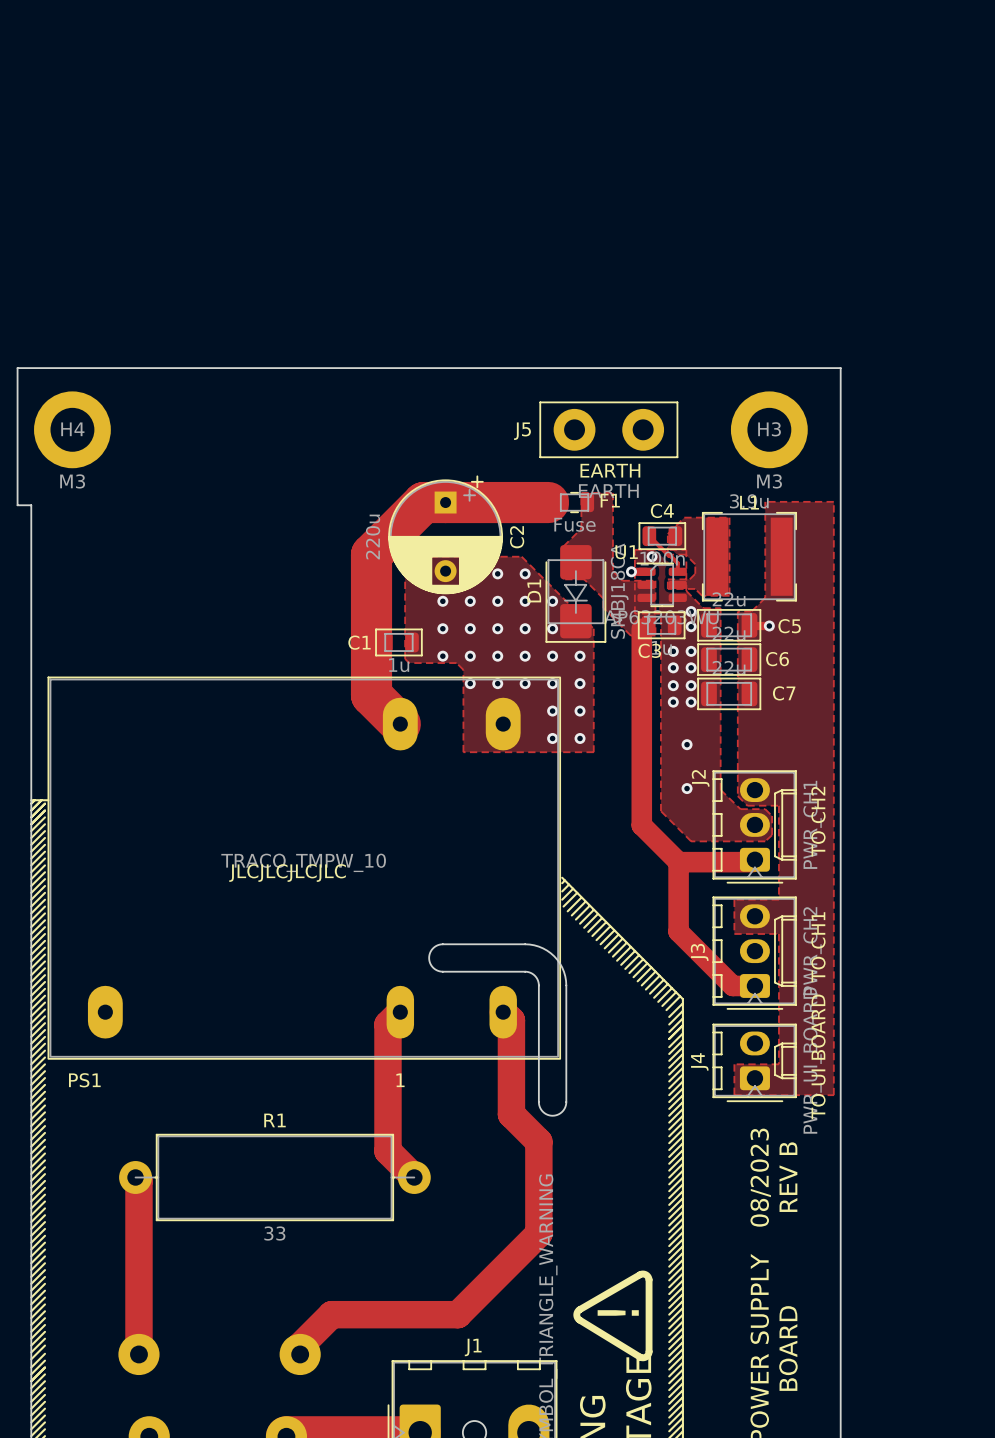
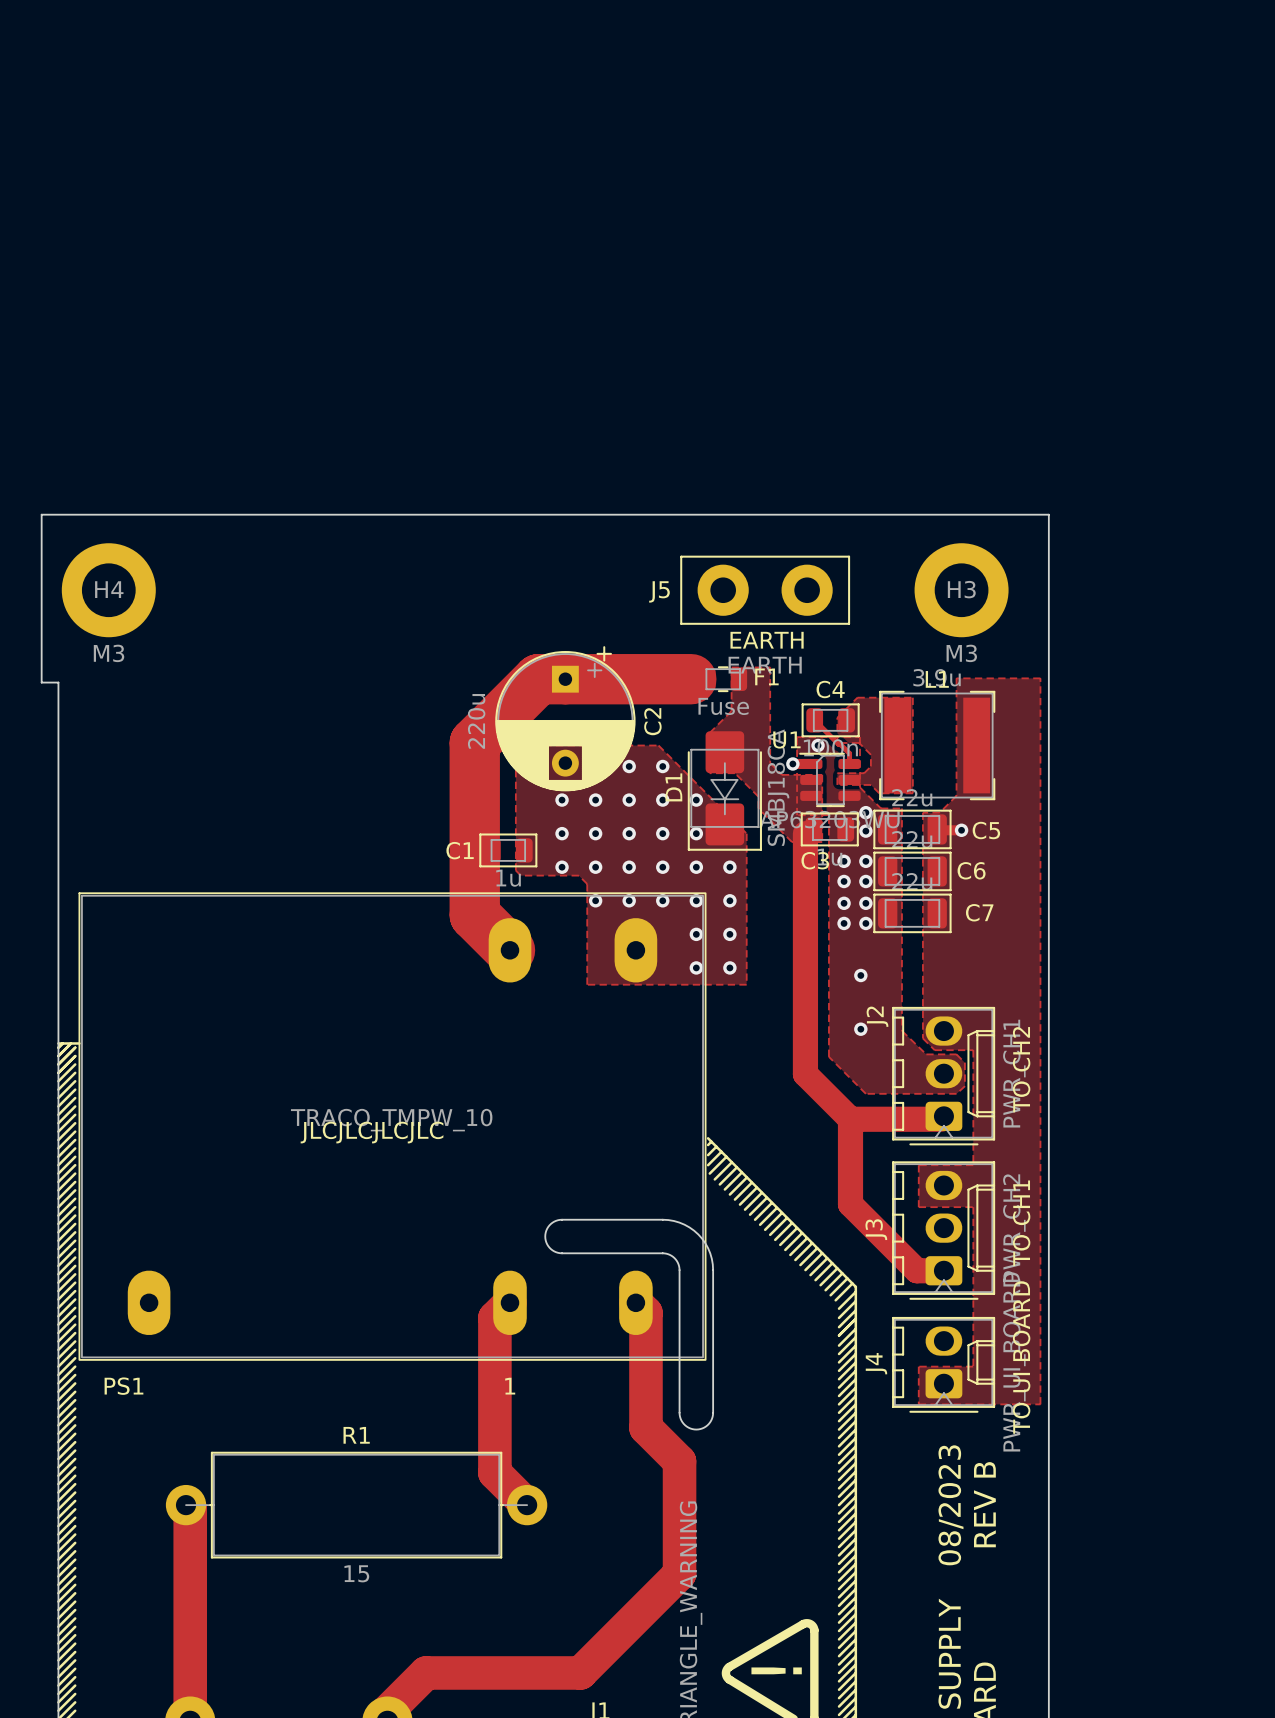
R1 value: 33 (274, 1233) -> 15 (356, 1573)

